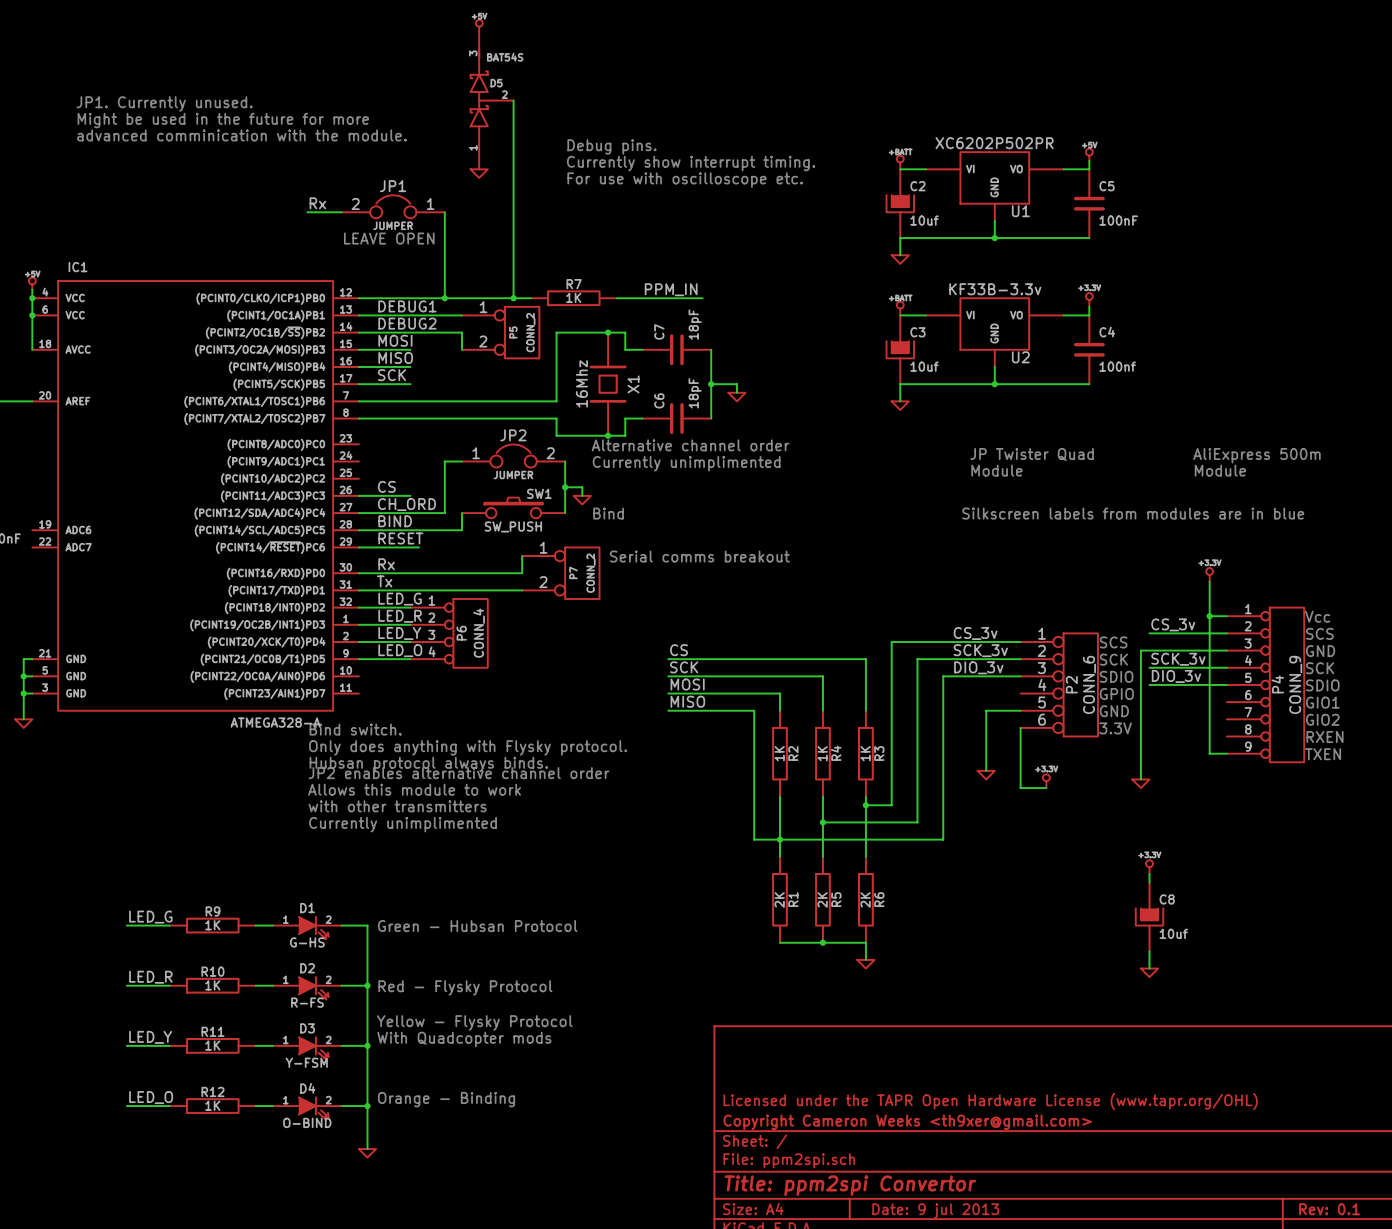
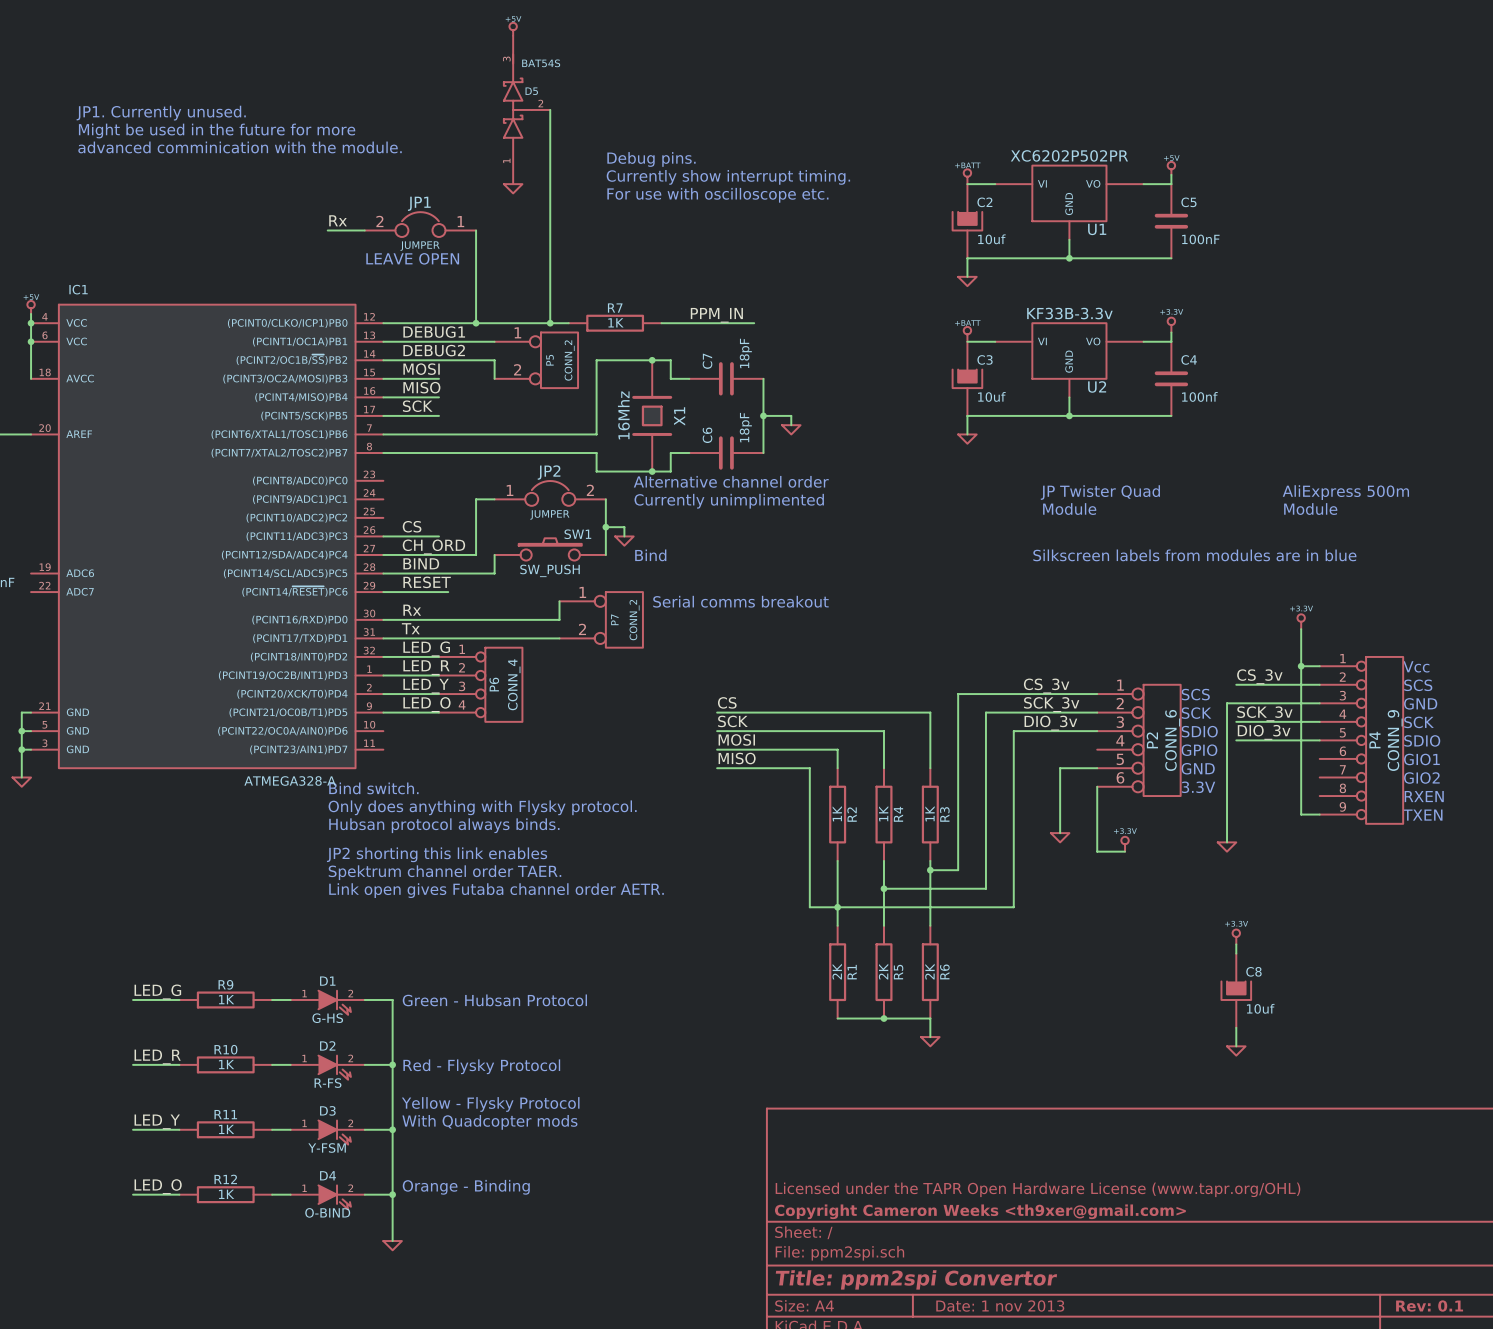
text: JP2 enables alternative channel order (459, 773) -> none
text: Allows this module to work (414, 789) -> JP2 shorting this link enables (437, 854)
text: with other transmitters (397, 806) -> Spektrum channel order TAER. (444, 872)
text: Currently unimplimented (403, 824) -> Link open gives Futaba channel order AETR. (496, 890)
title block: Date: 9 jul 2013 (935, 1210) -> Date: 1 nov 2013 (1000, 1306)

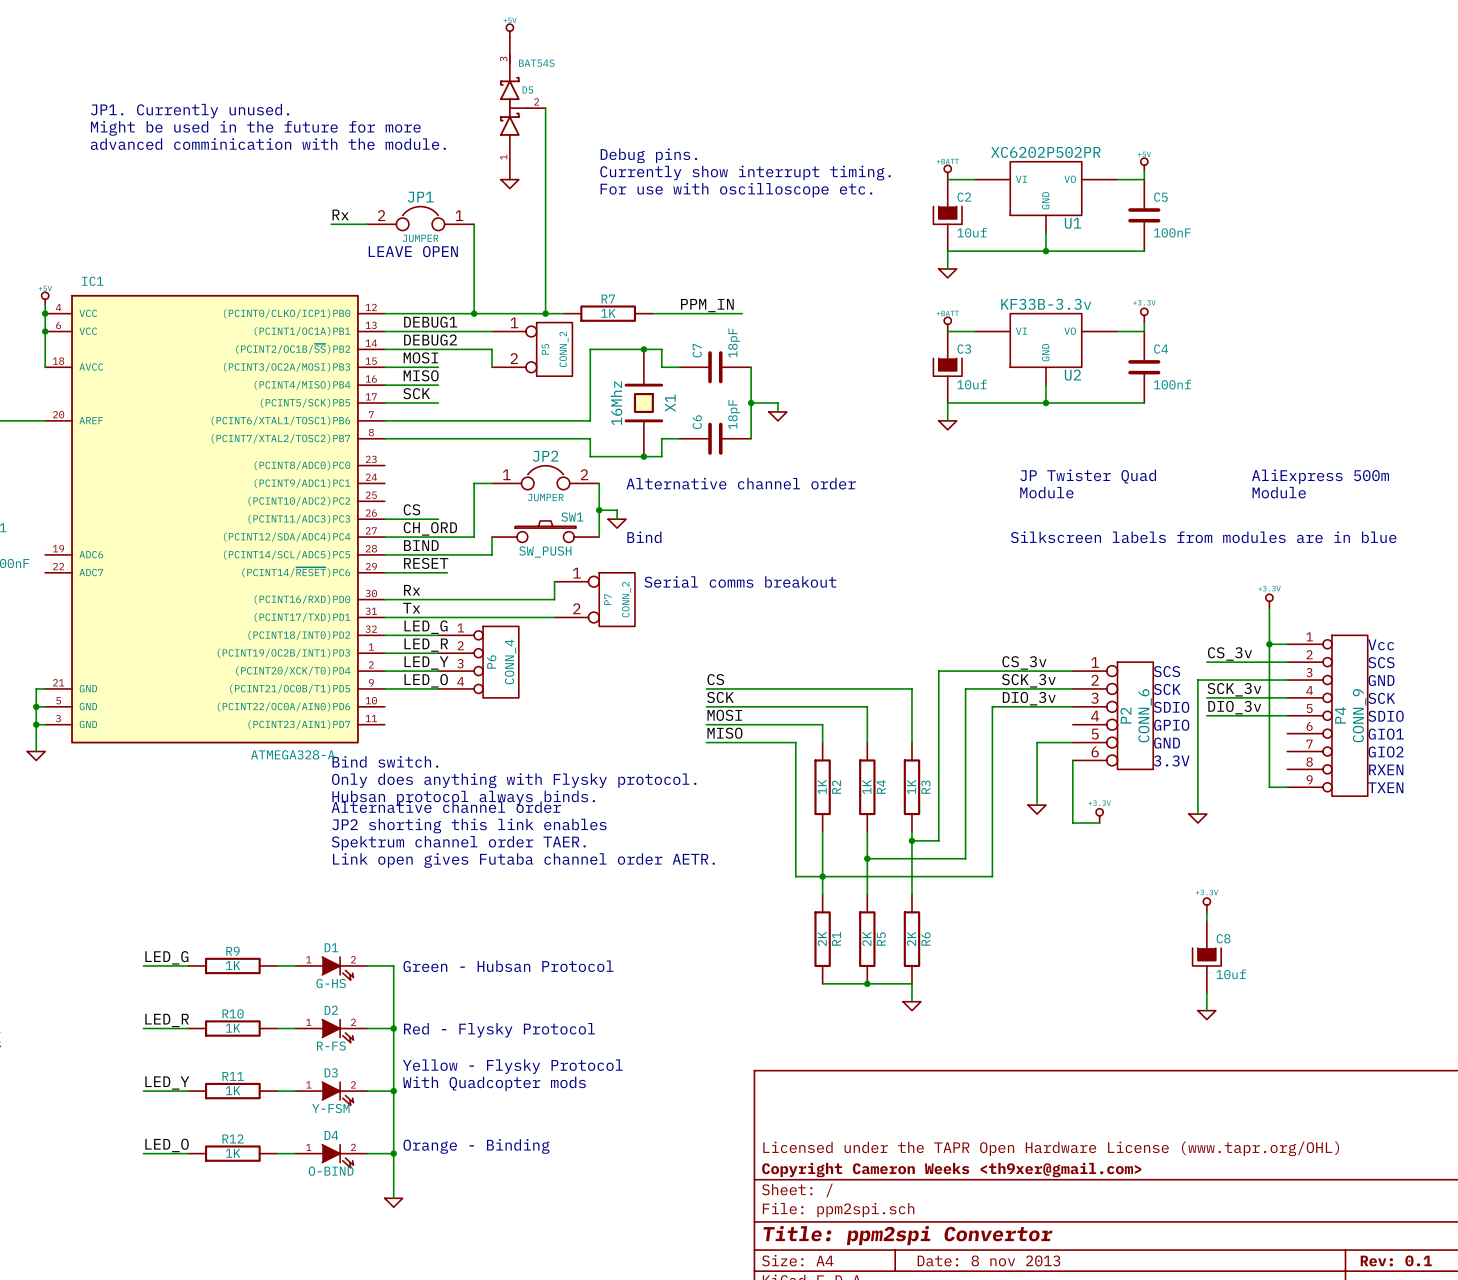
text: Alternative channel order (731, 481) -> none
text: Currently unimplimented (729, 501) -> Alternative channel order (741, 483)
text: none -> Alternative channel order (446, 807)
title block: Date: 1 nov 2013 (1000, 1306) -> Date: 8 nov 2013 (988, 1260)

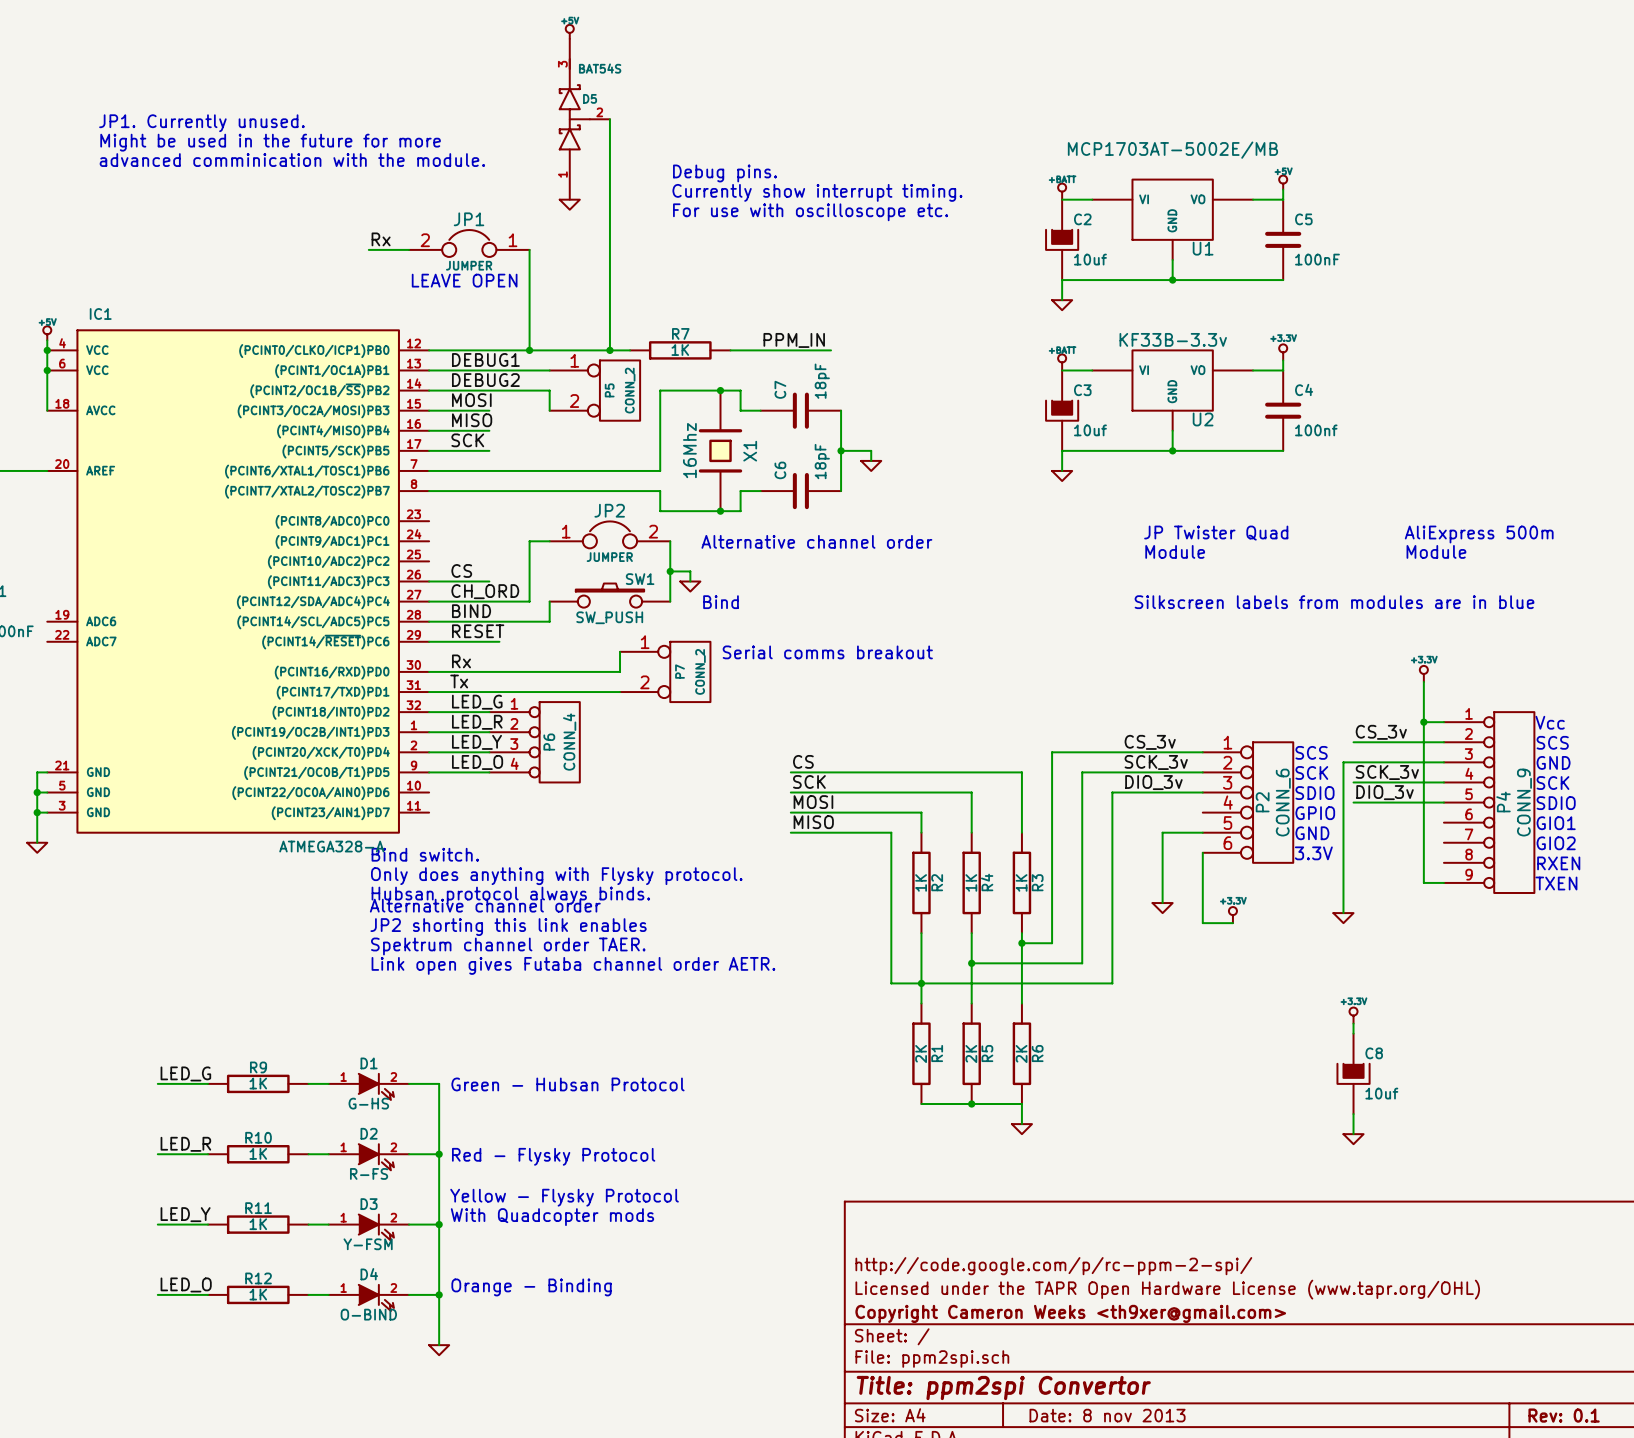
U1 value: XC6202P502PR (1045, 152) -> MCP1703AT-5002E/MB (1172, 150)
title block: none -> http://code.google.com/p/rc-ppm-2-spi/ (1053, 1266)

